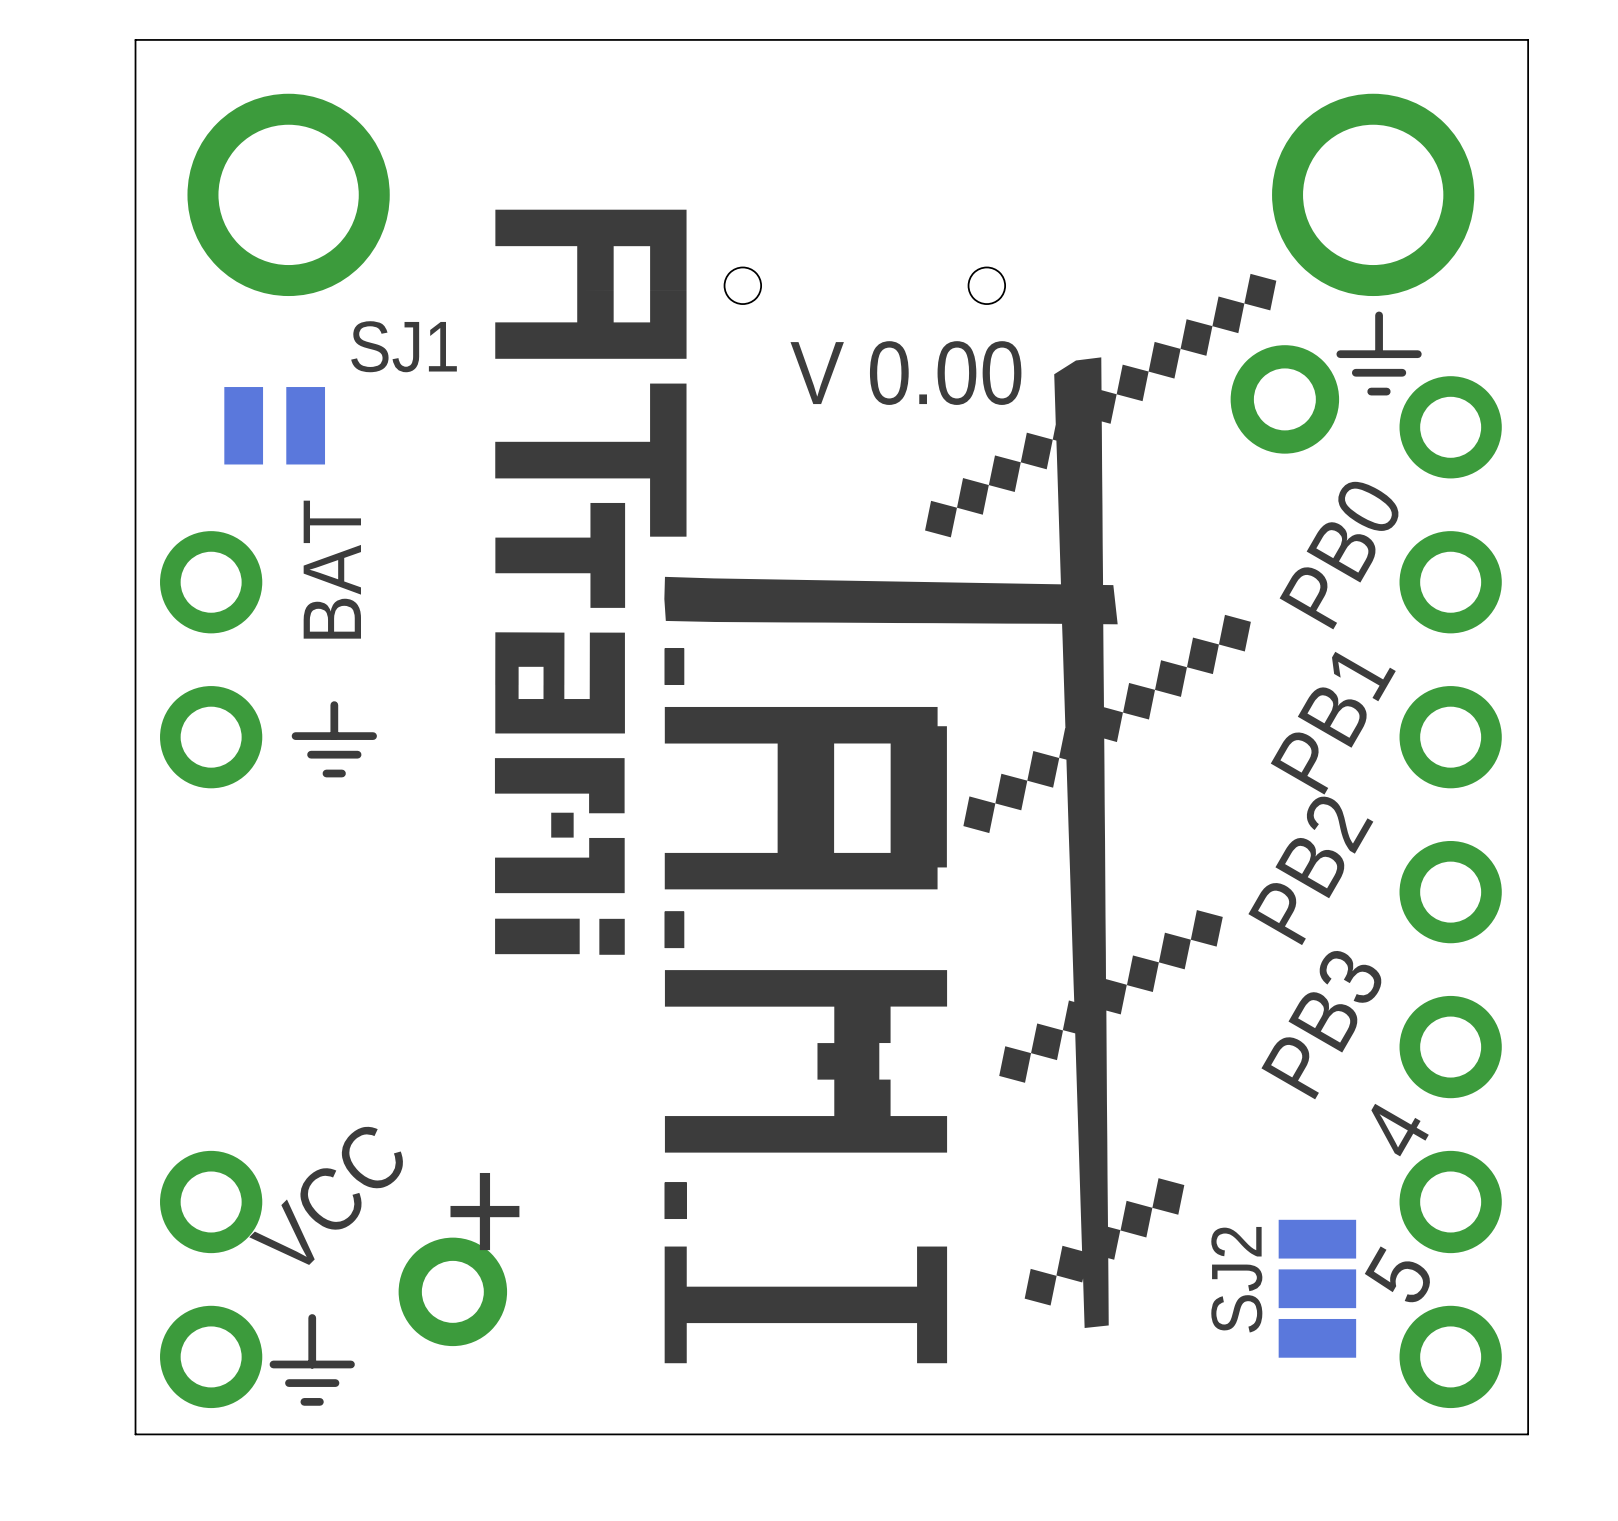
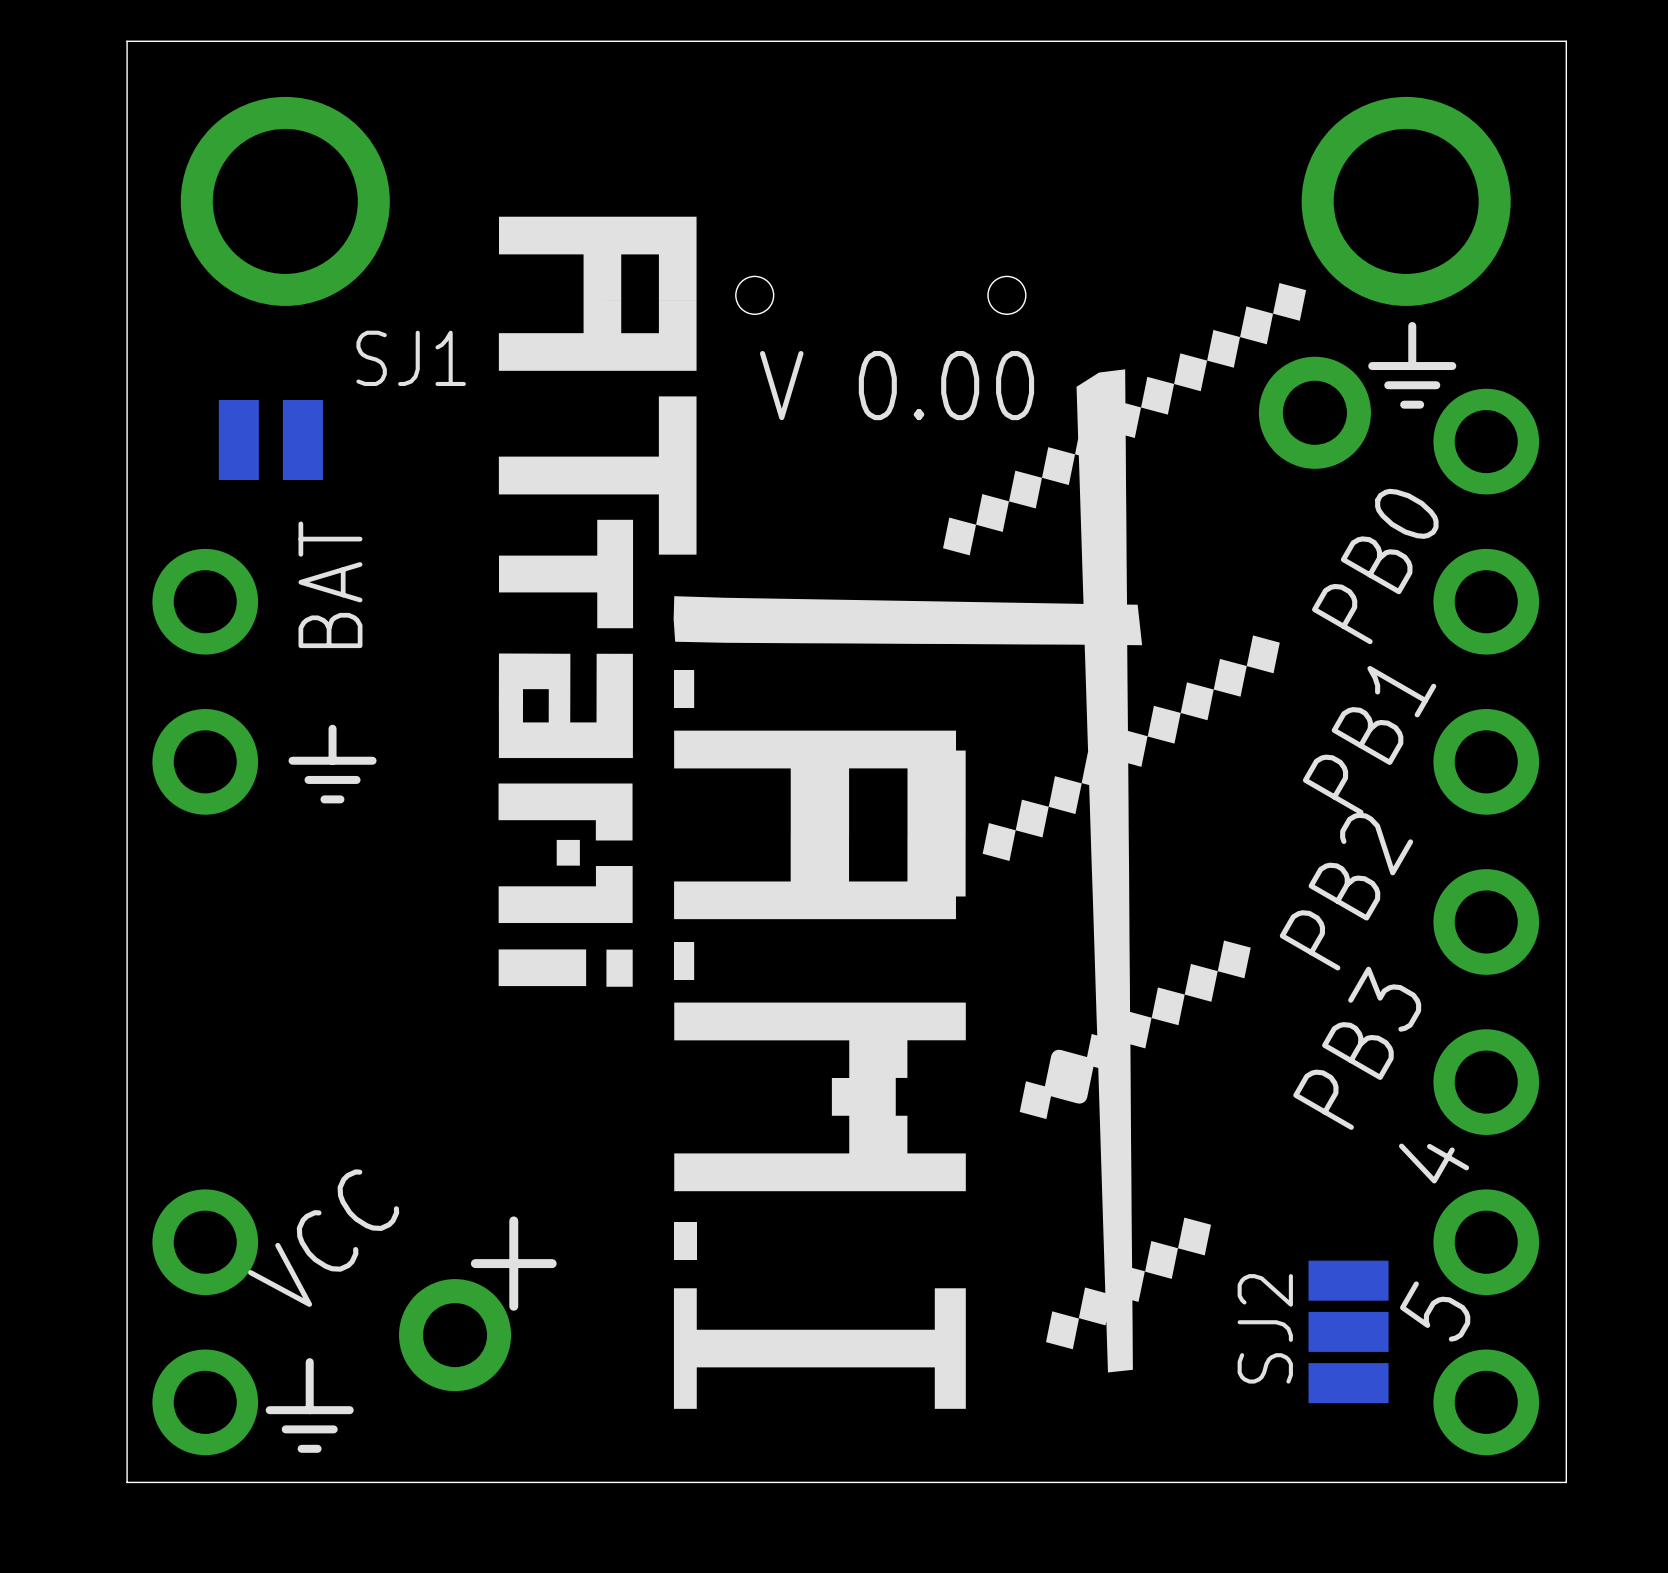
drawing shape: [1031, 1023, 1064, 1061] -> [1044, 1049, 1094, 1104]

